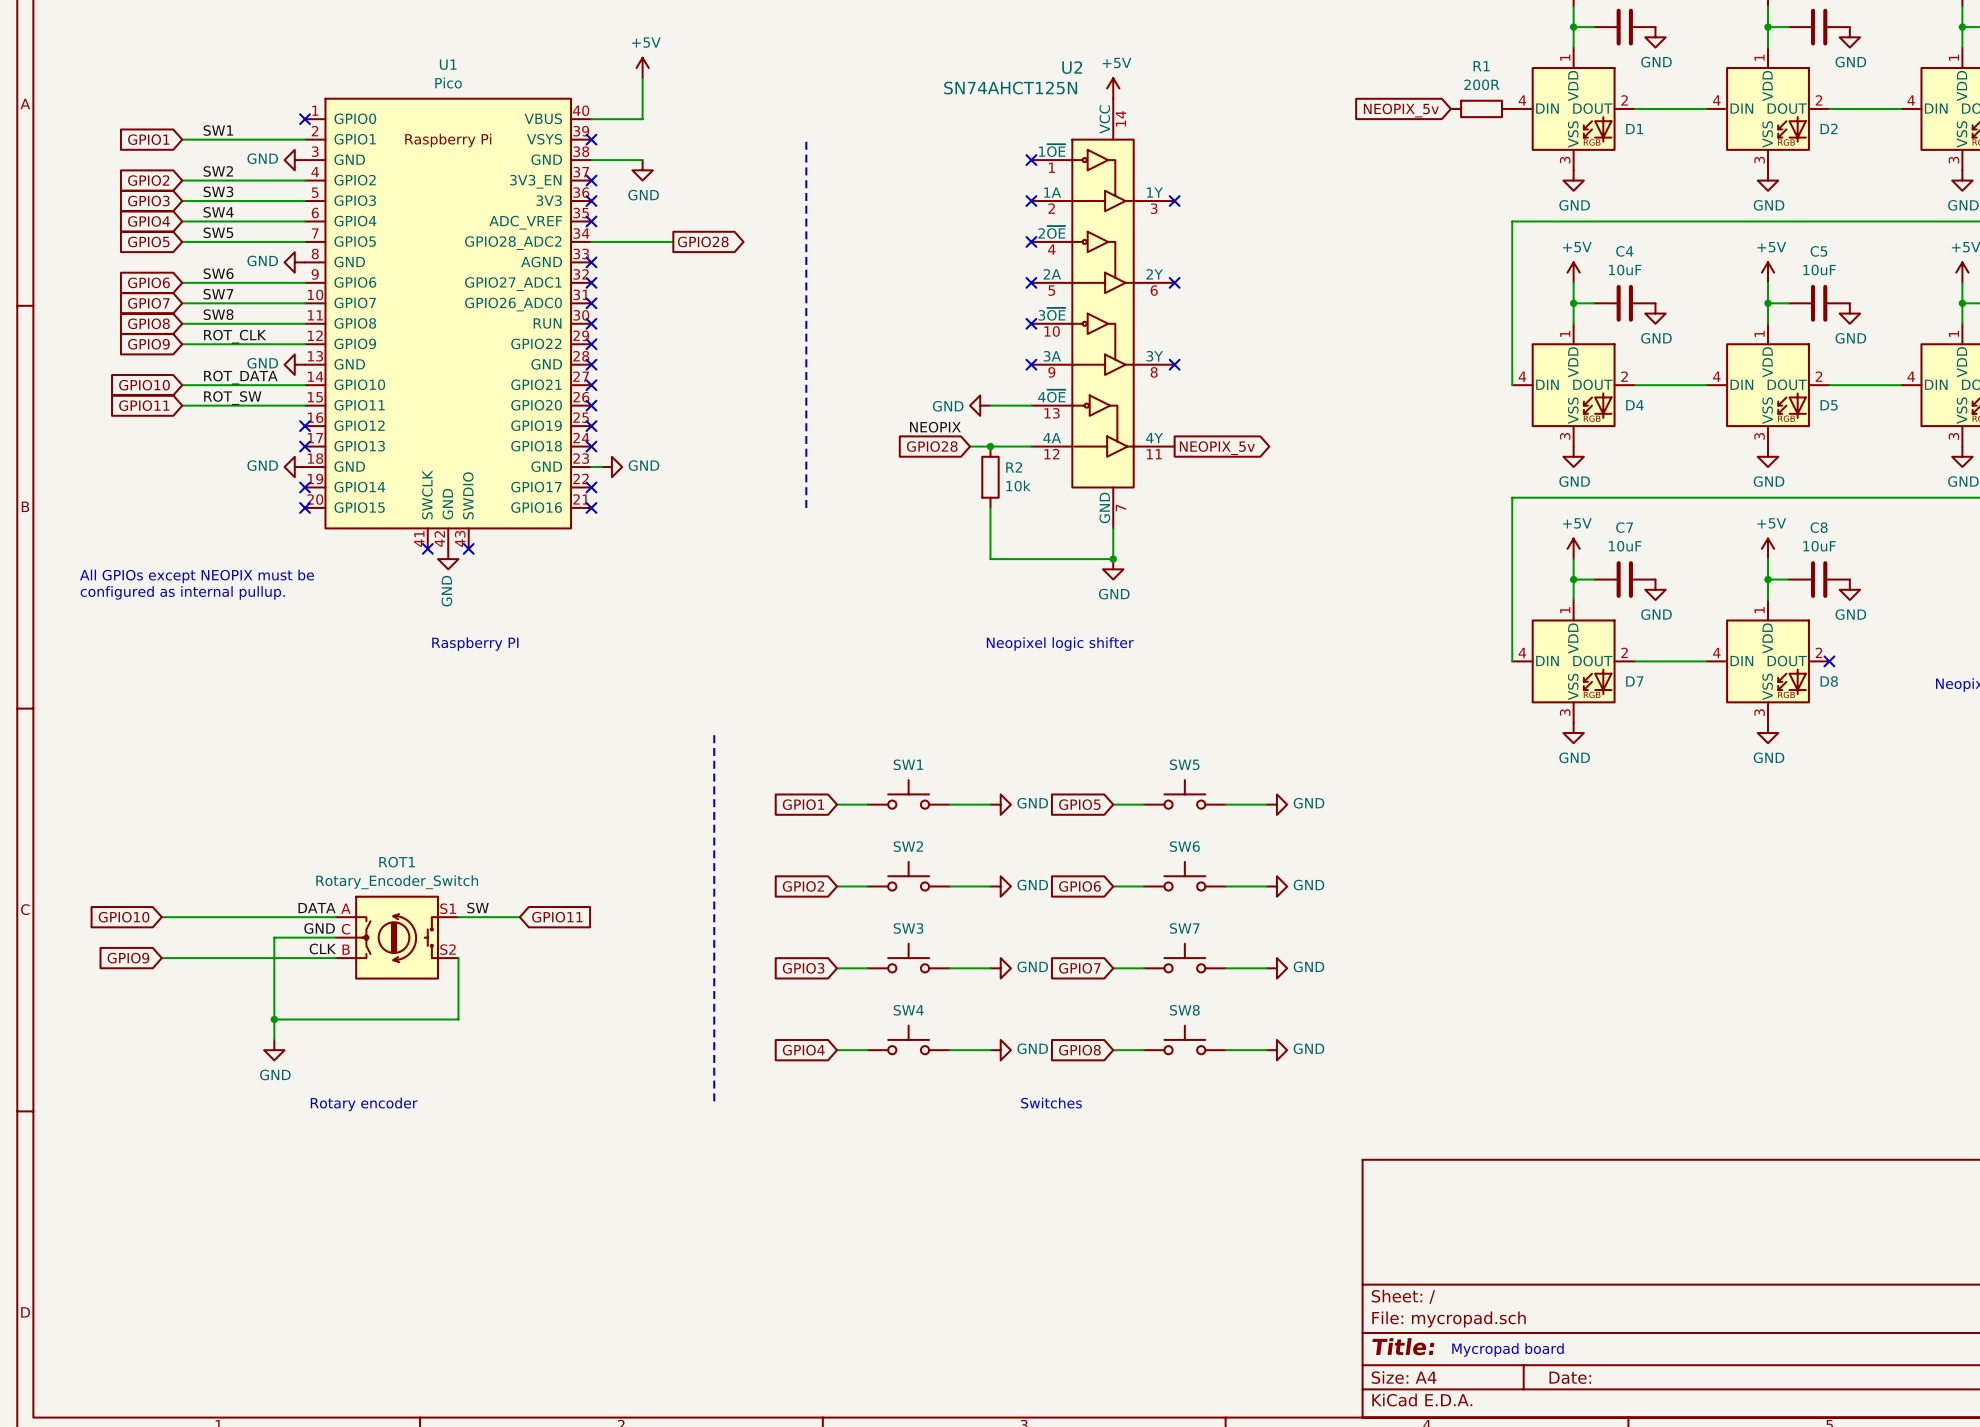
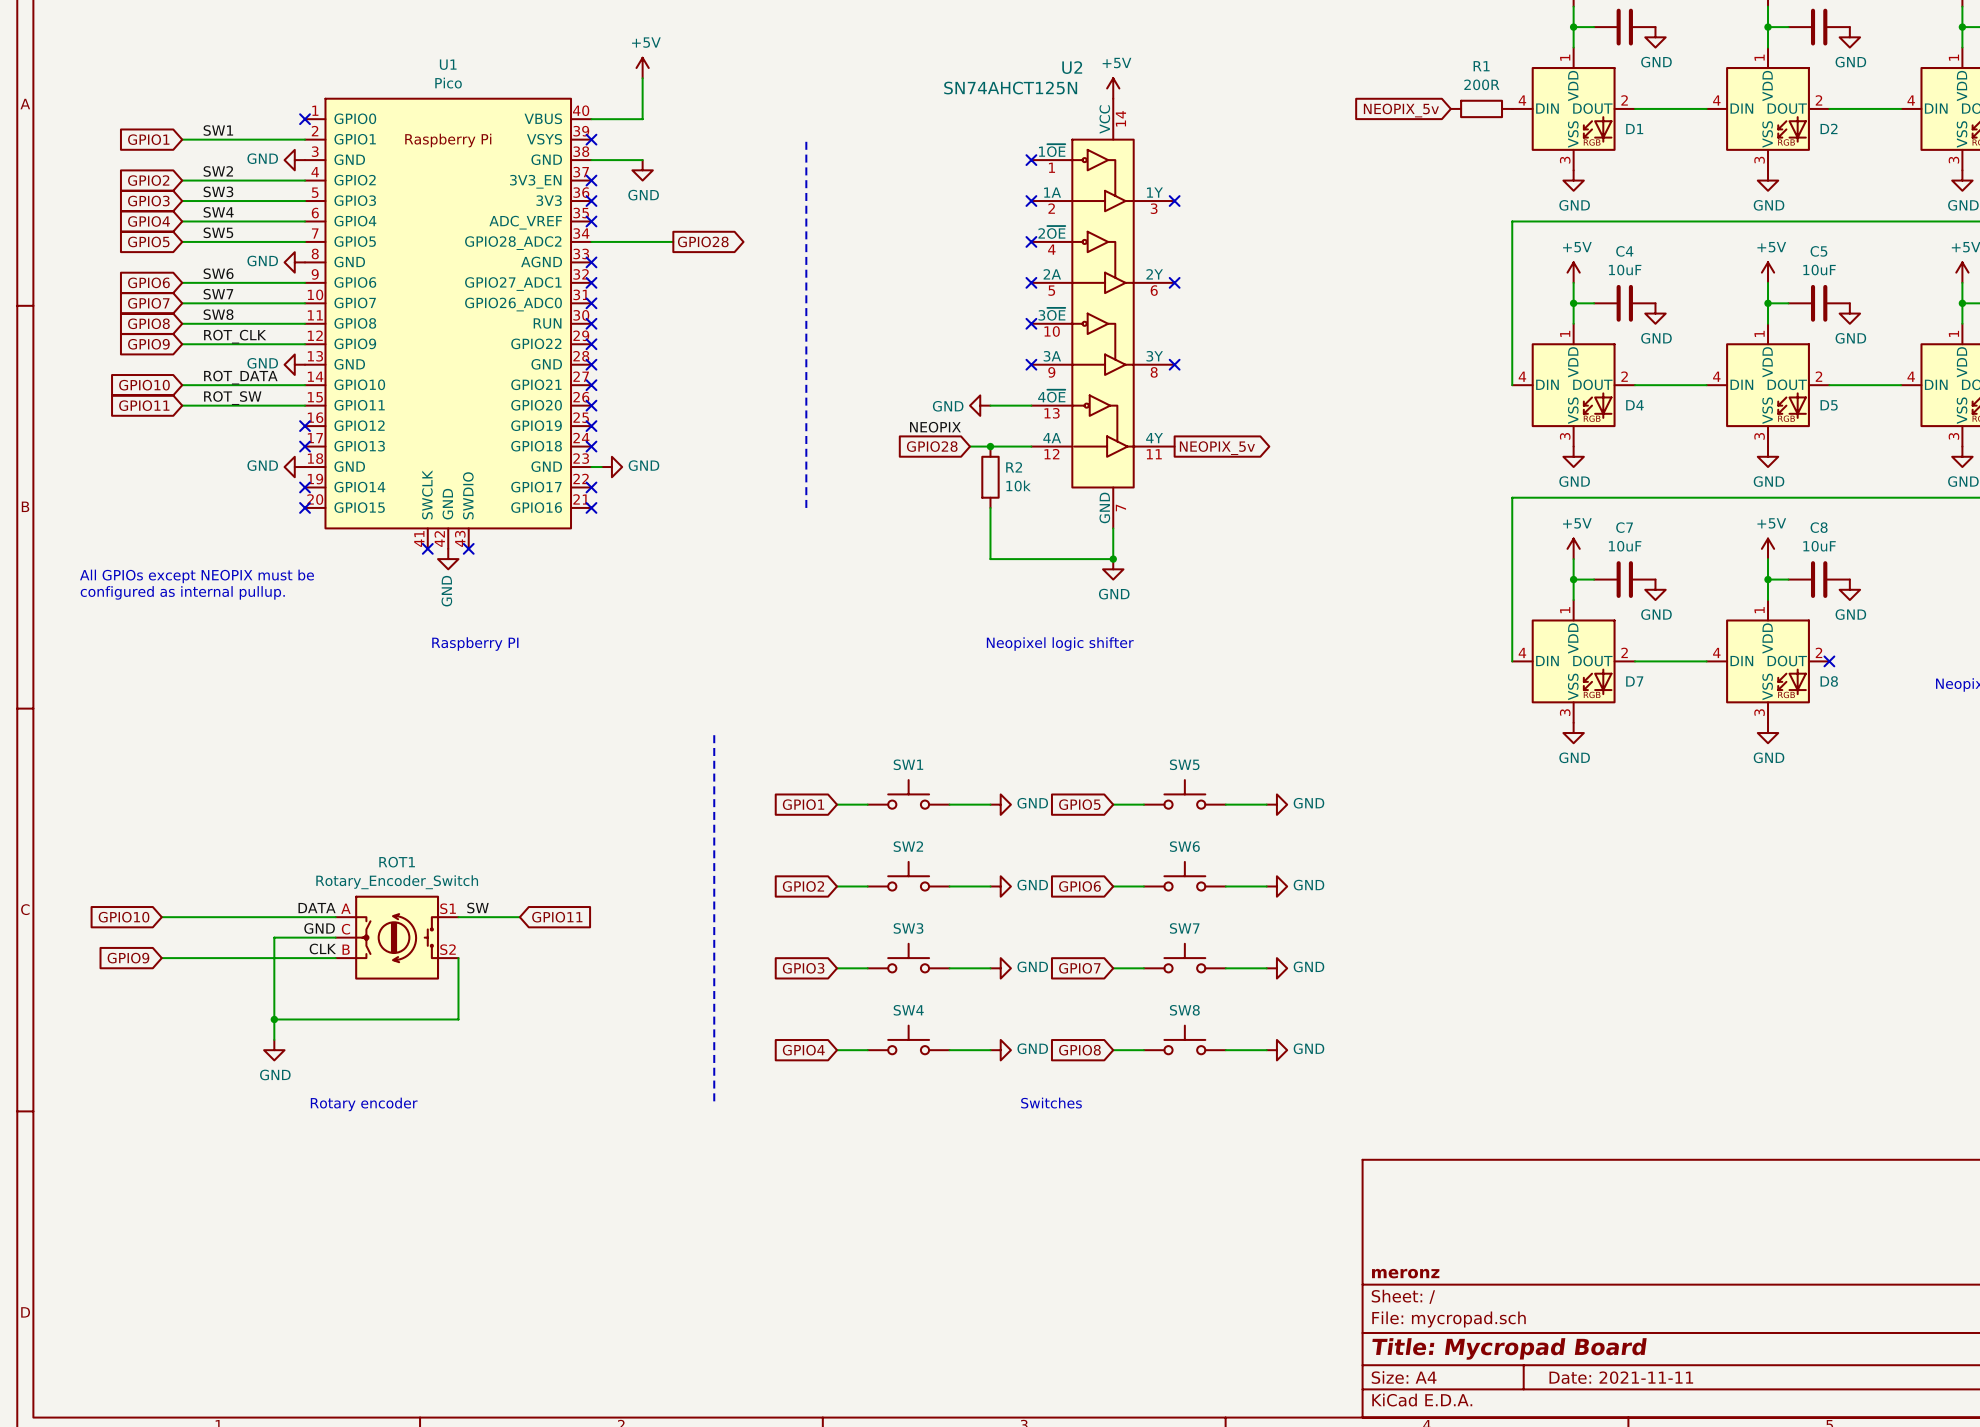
title block: none -> meronz (1405, 1273)
title block: Title: (1403, 1346) -> Title: Mycropad Board (1509, 1348)
text: Mycropad board (1507, 1349) -> none
title block: Date: (1570, 1377) -> Date: 2021-11-11 (1621, 1377)

